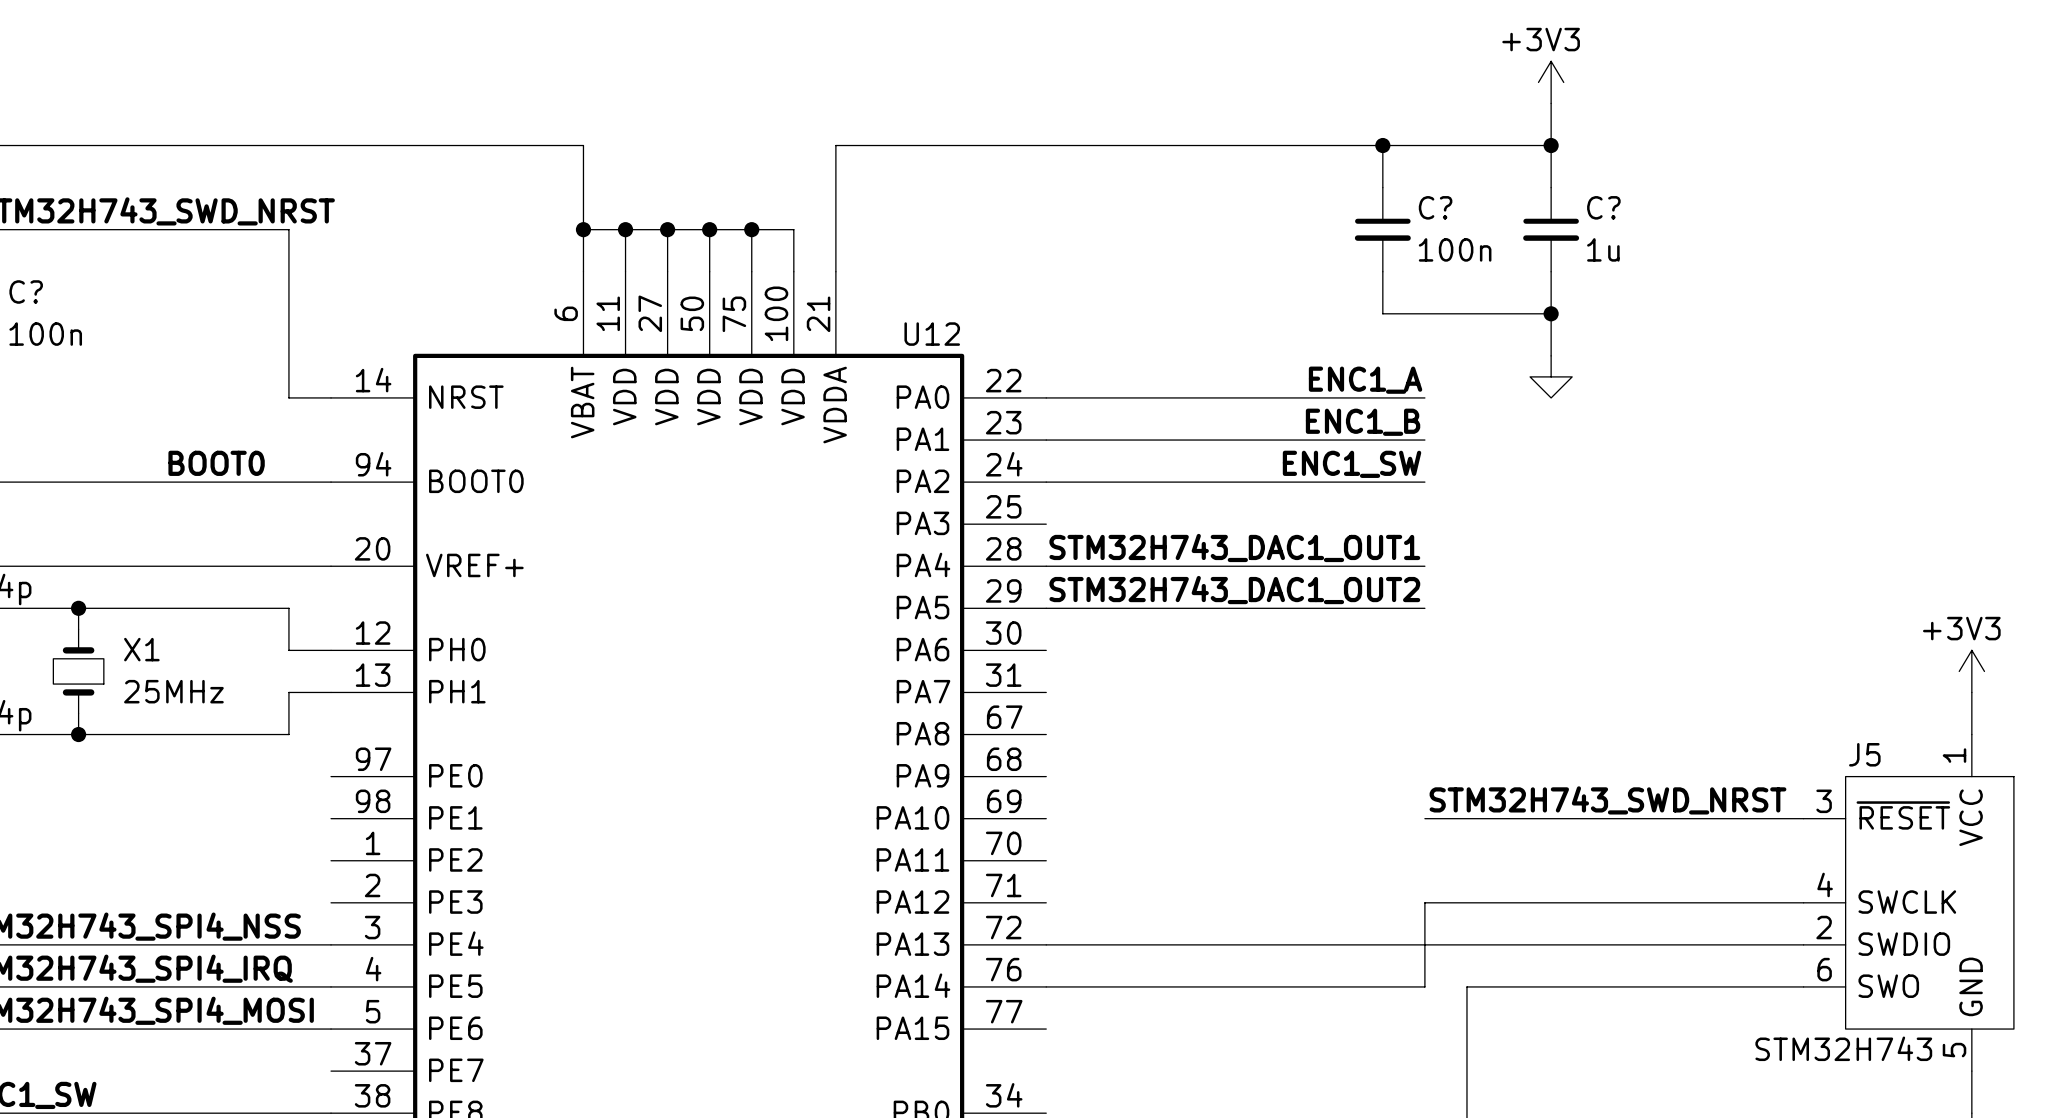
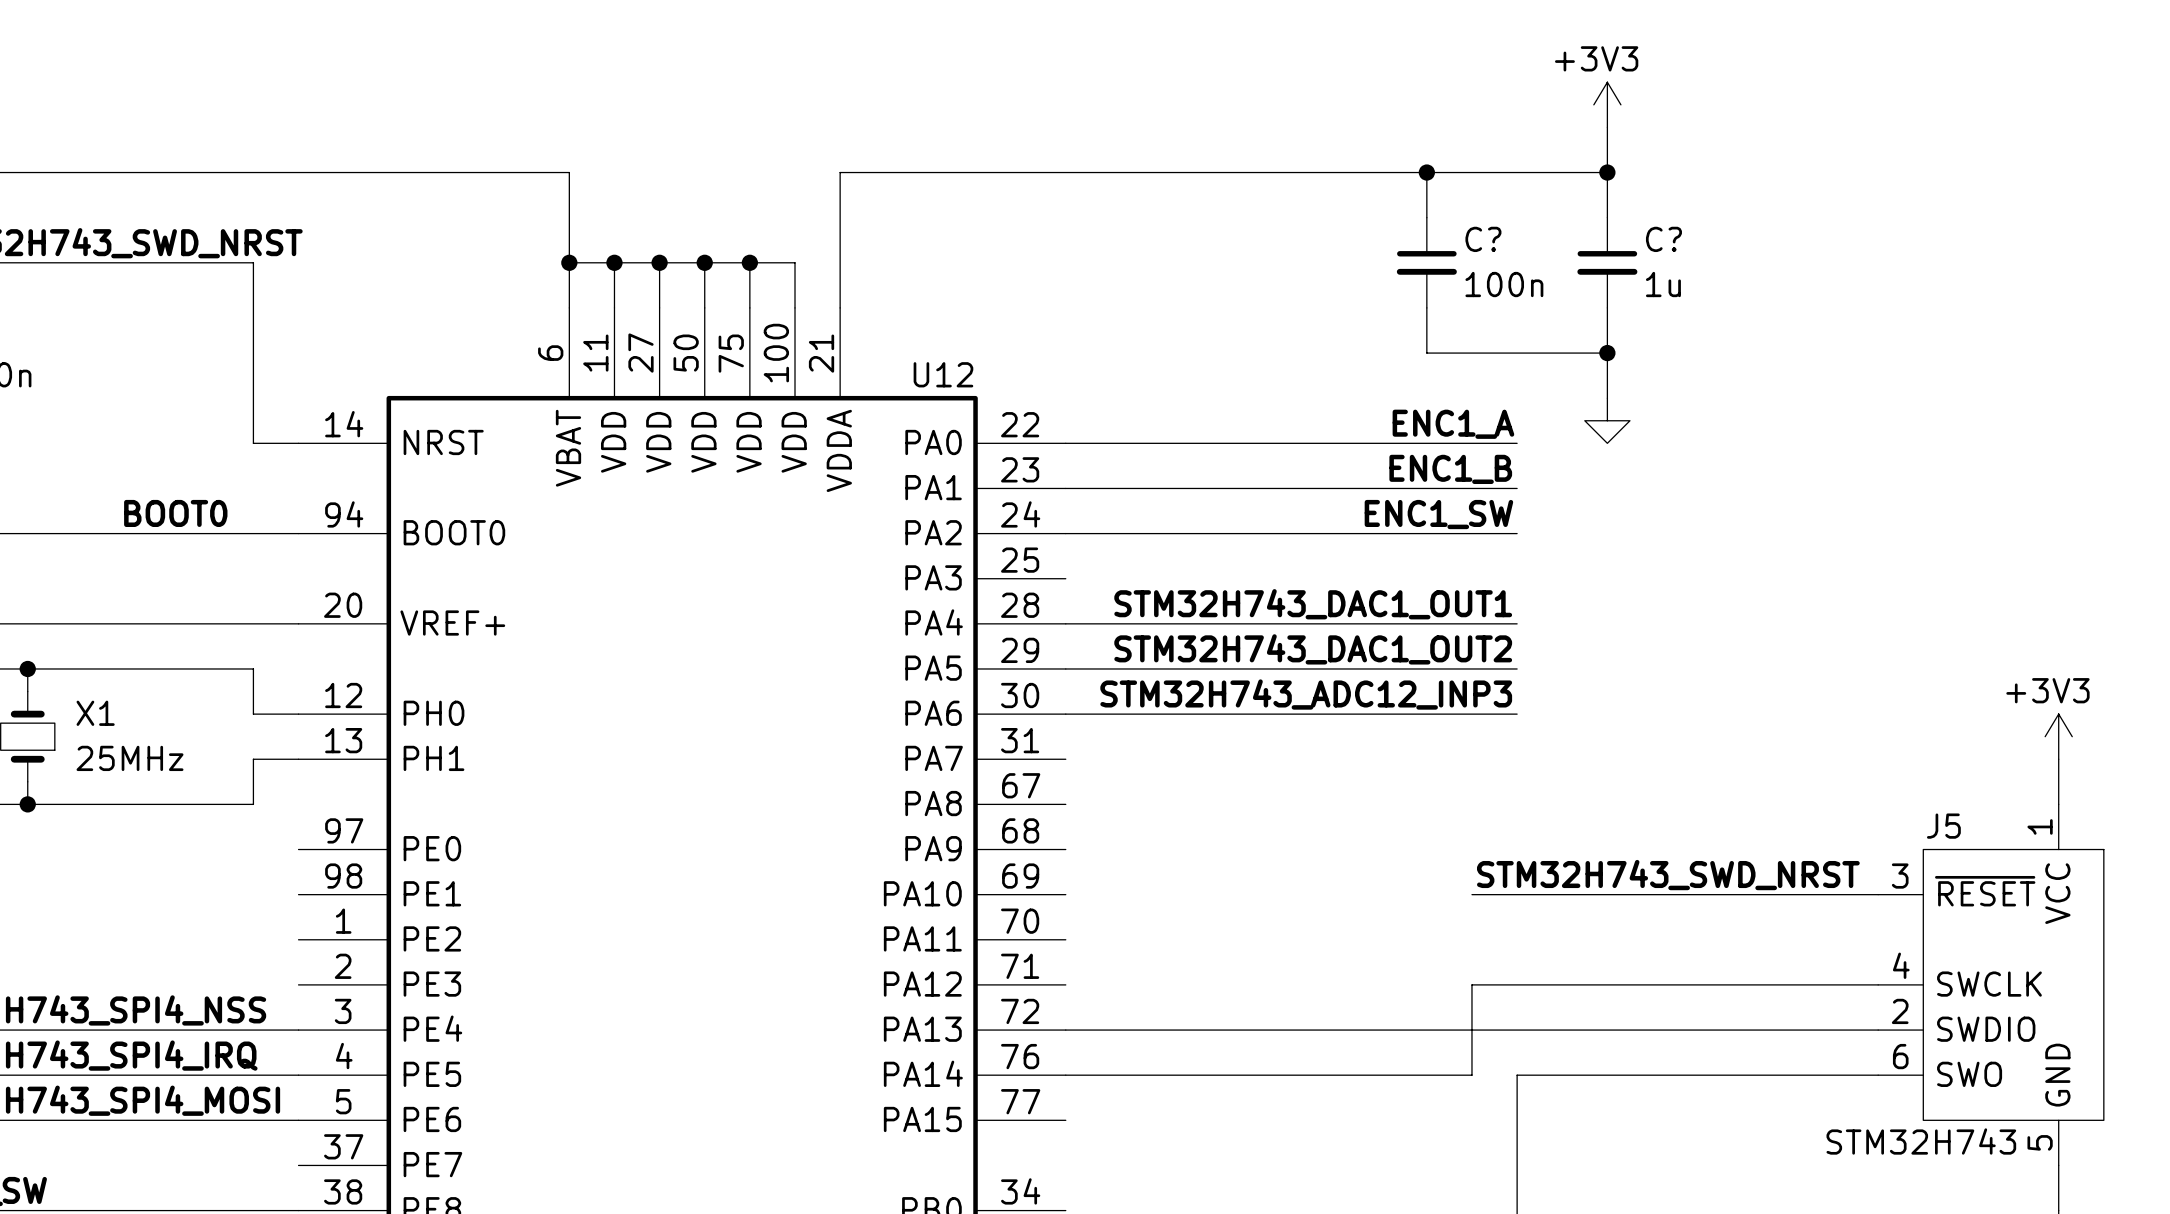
label position: ENC1_A (1365, 380) -> ENC1_A (1453, 424)
wire: none -> (1471, 443) (1517, 443)
label position: ENC1_B (1363, 422) -> ENC1_B (1450, 469)
wire: none -> (1471, 488) (1517, 488)
label position: ENC1_SW (1352, 464) -> ENC1_SW (1438, 514)
wire: none -> (1471, 533) (1517, 533)
label position: STM32H743_DAC1_OUT1 (1234, 547) -> STM32H743_DAC1_OUT1 (1313, 604)
wire: none -> (1471, 623) (1517, 623)
label position: STM32H743_DAC1_OUT2 (1234, 590) -> STM32H743_DAC1_OUT2 (1313, 649)
wire: none -> (1471, 668) (1517, 668)
label: none -> STM32H743_ADC12_INP3 (1306, 694)
wire: none -> (1065, 714) (1517, 714)

